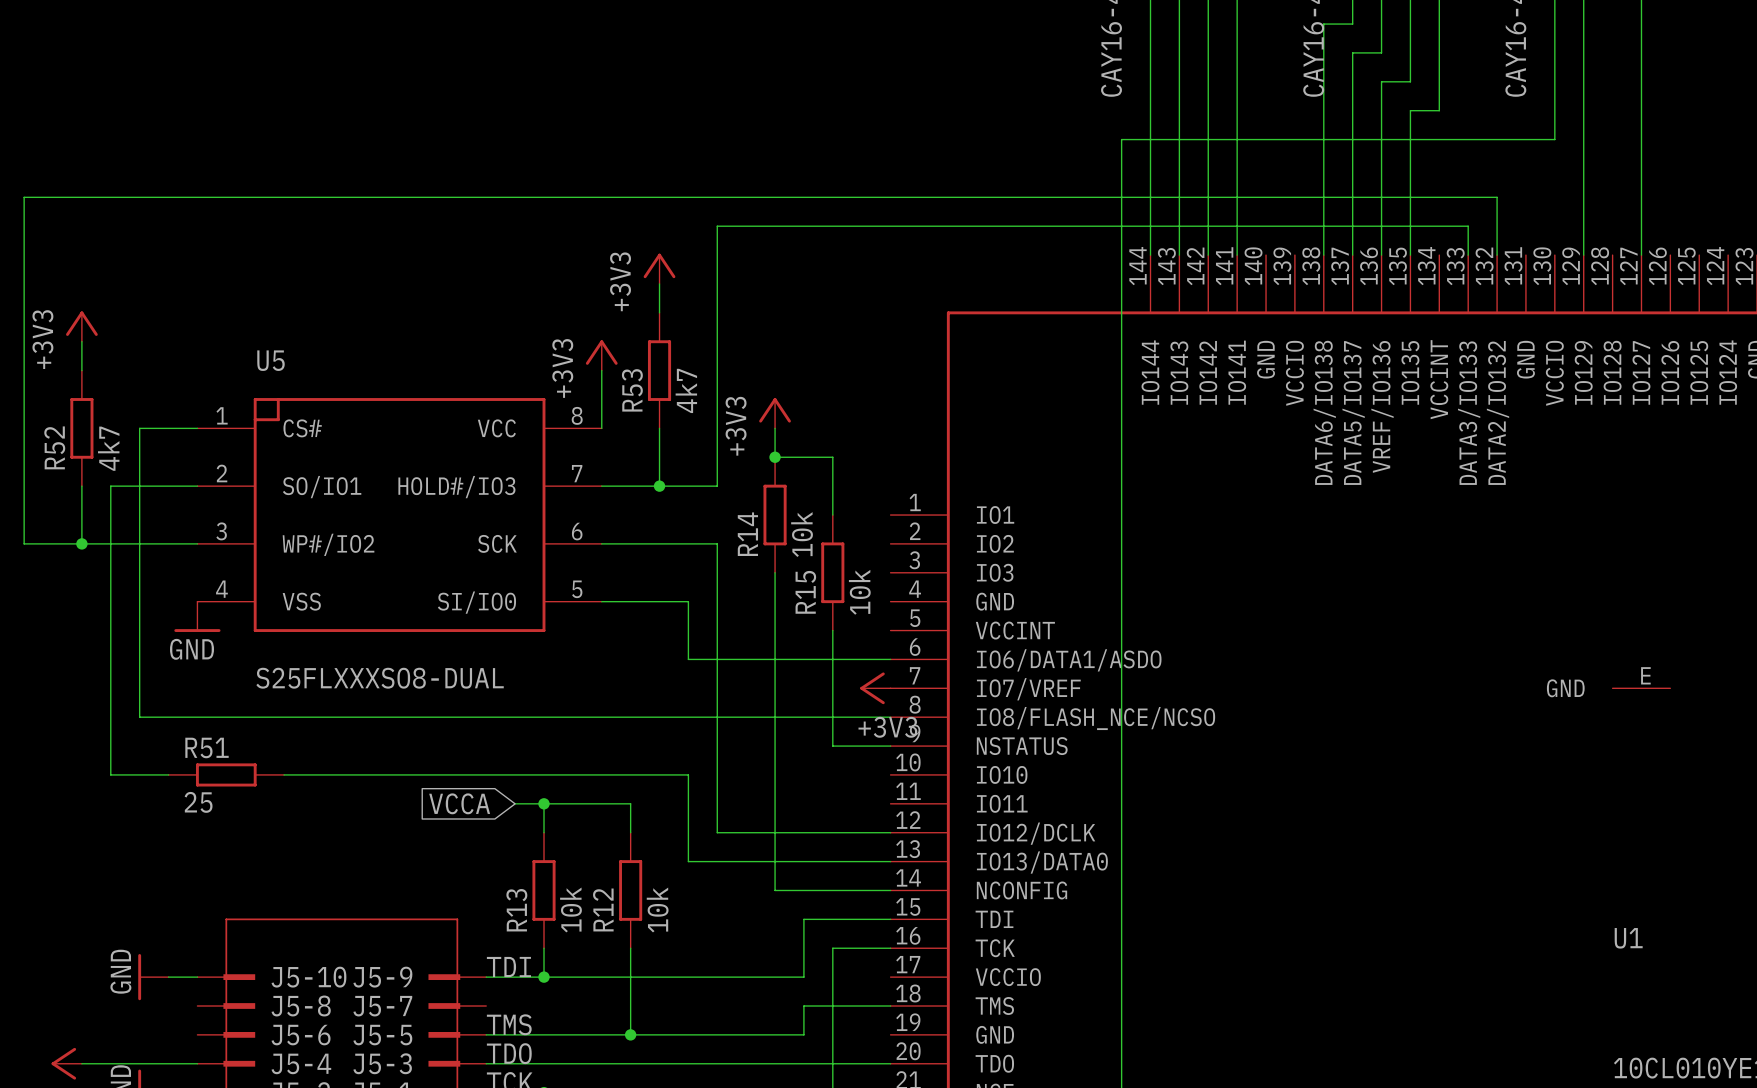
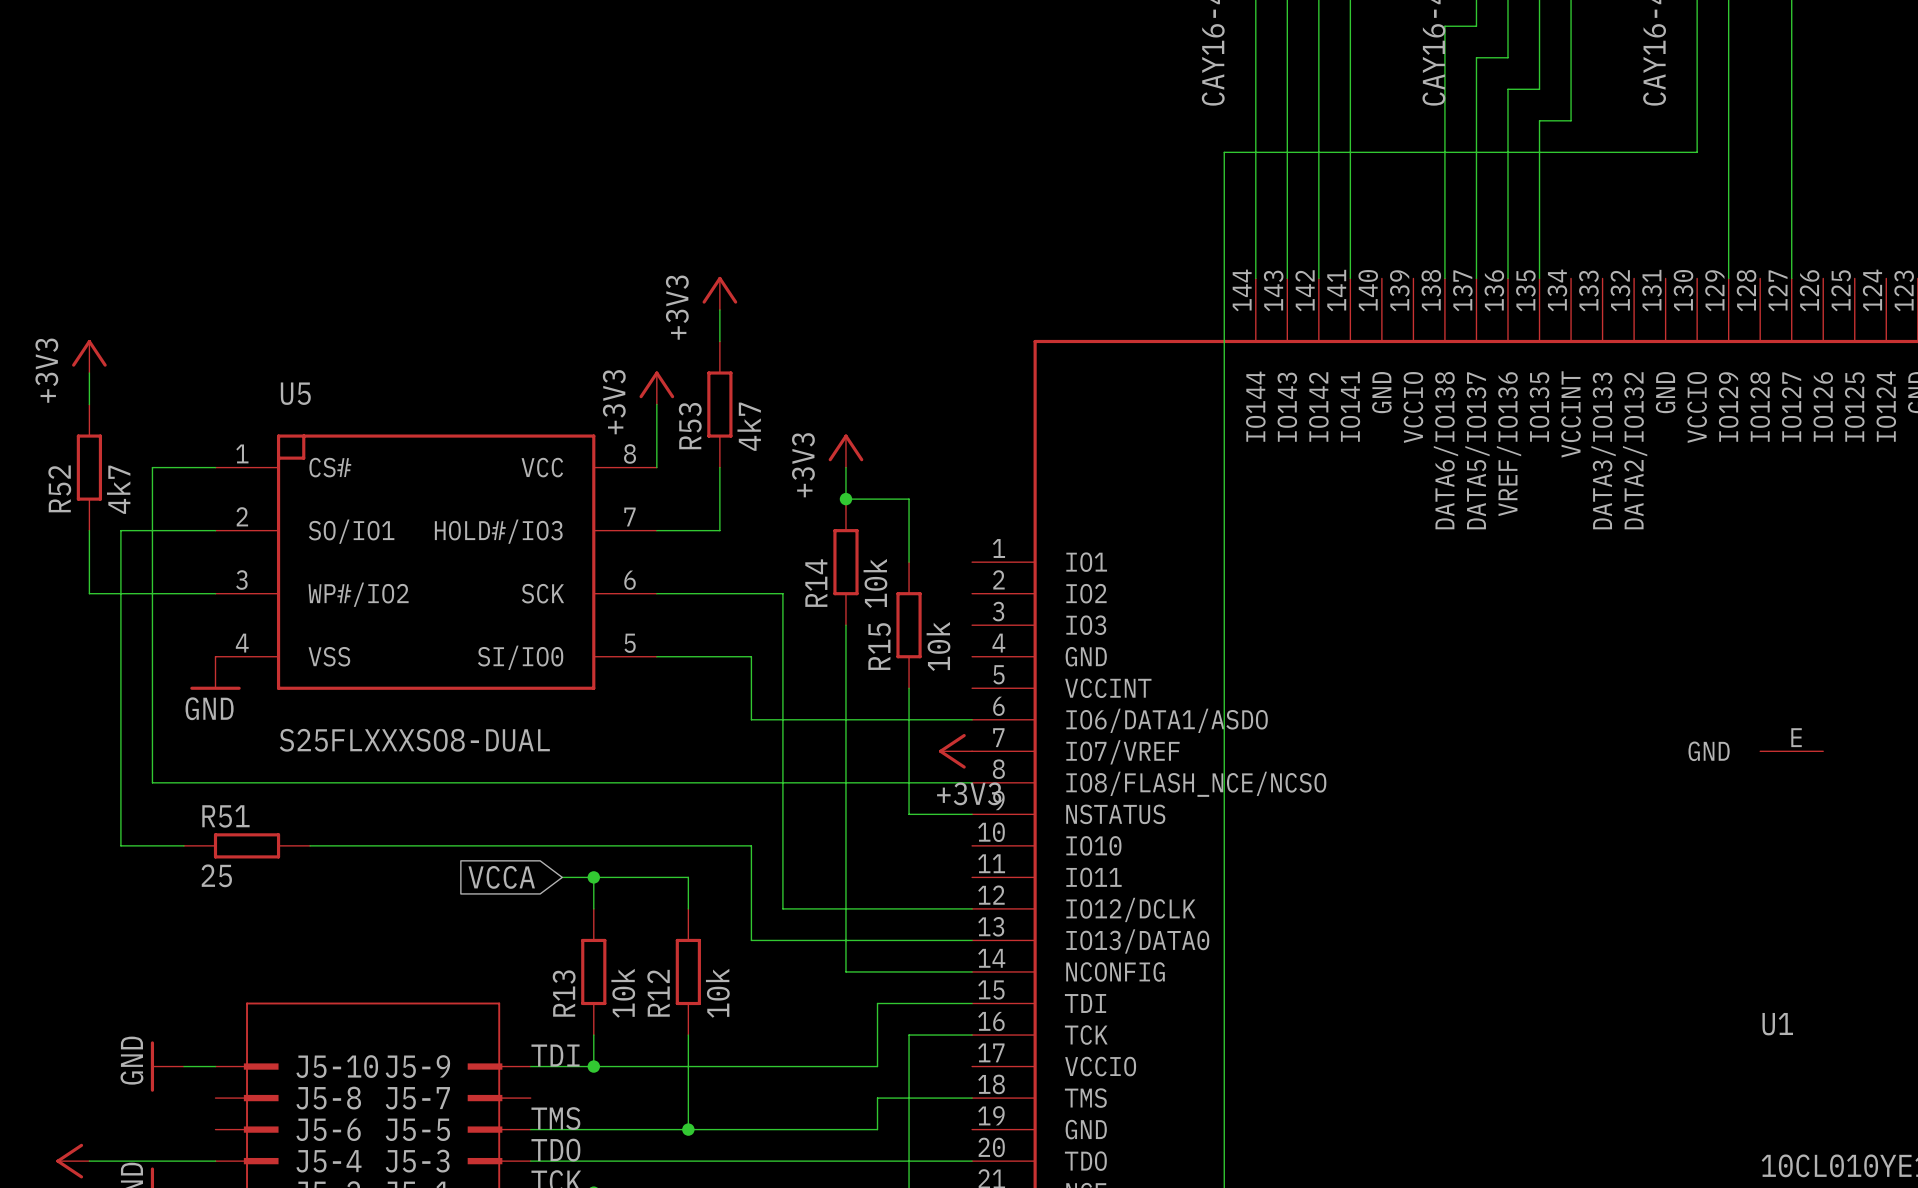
wire: (1468, 255) (1468, 226) (717, 226) (717, 486) (659, 486) -> none
wire: (1497, 255) (1497, 197) (24, 197) (24, 543) (81, 543) -> none
junction: (659, 486) -> none
junction: (81, 543) -> none

